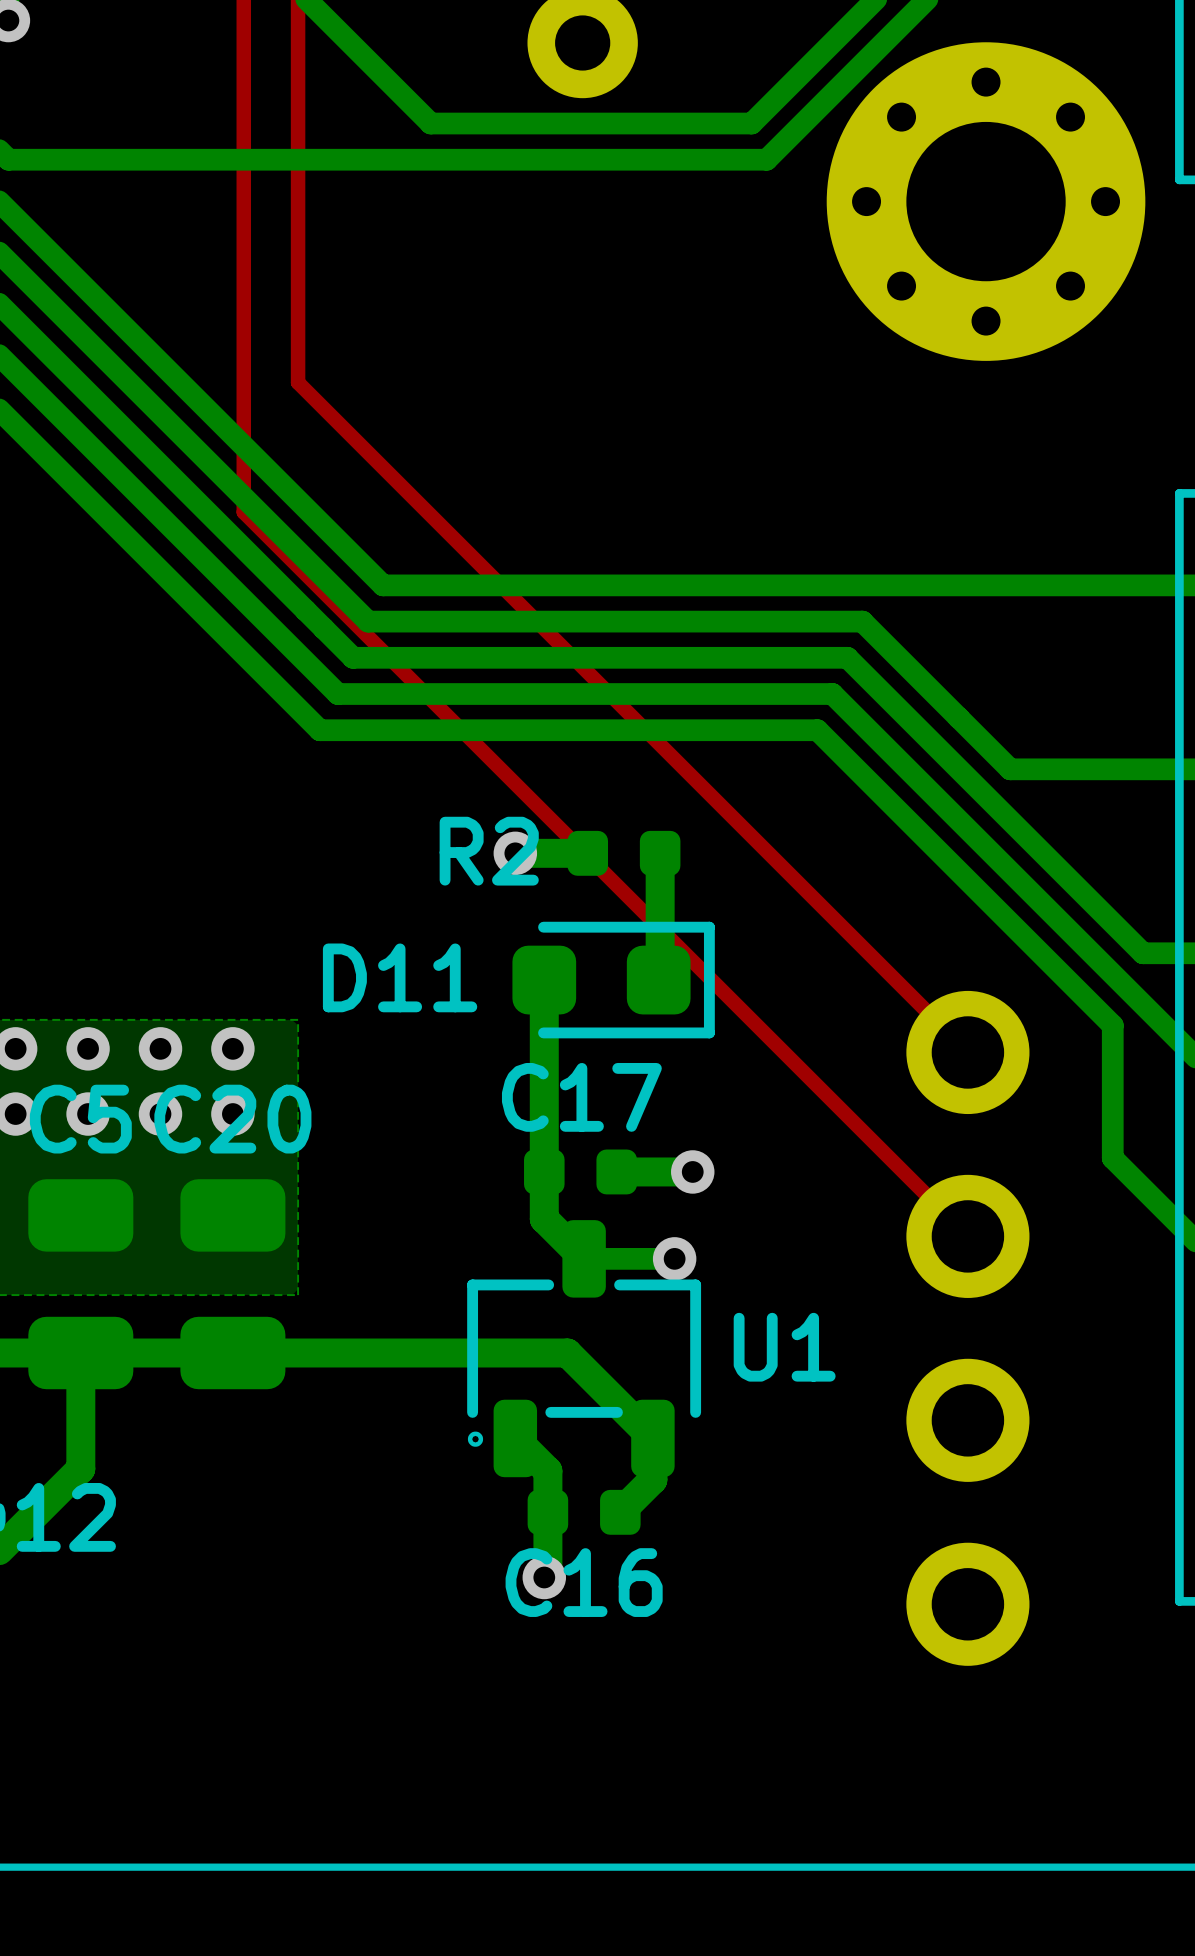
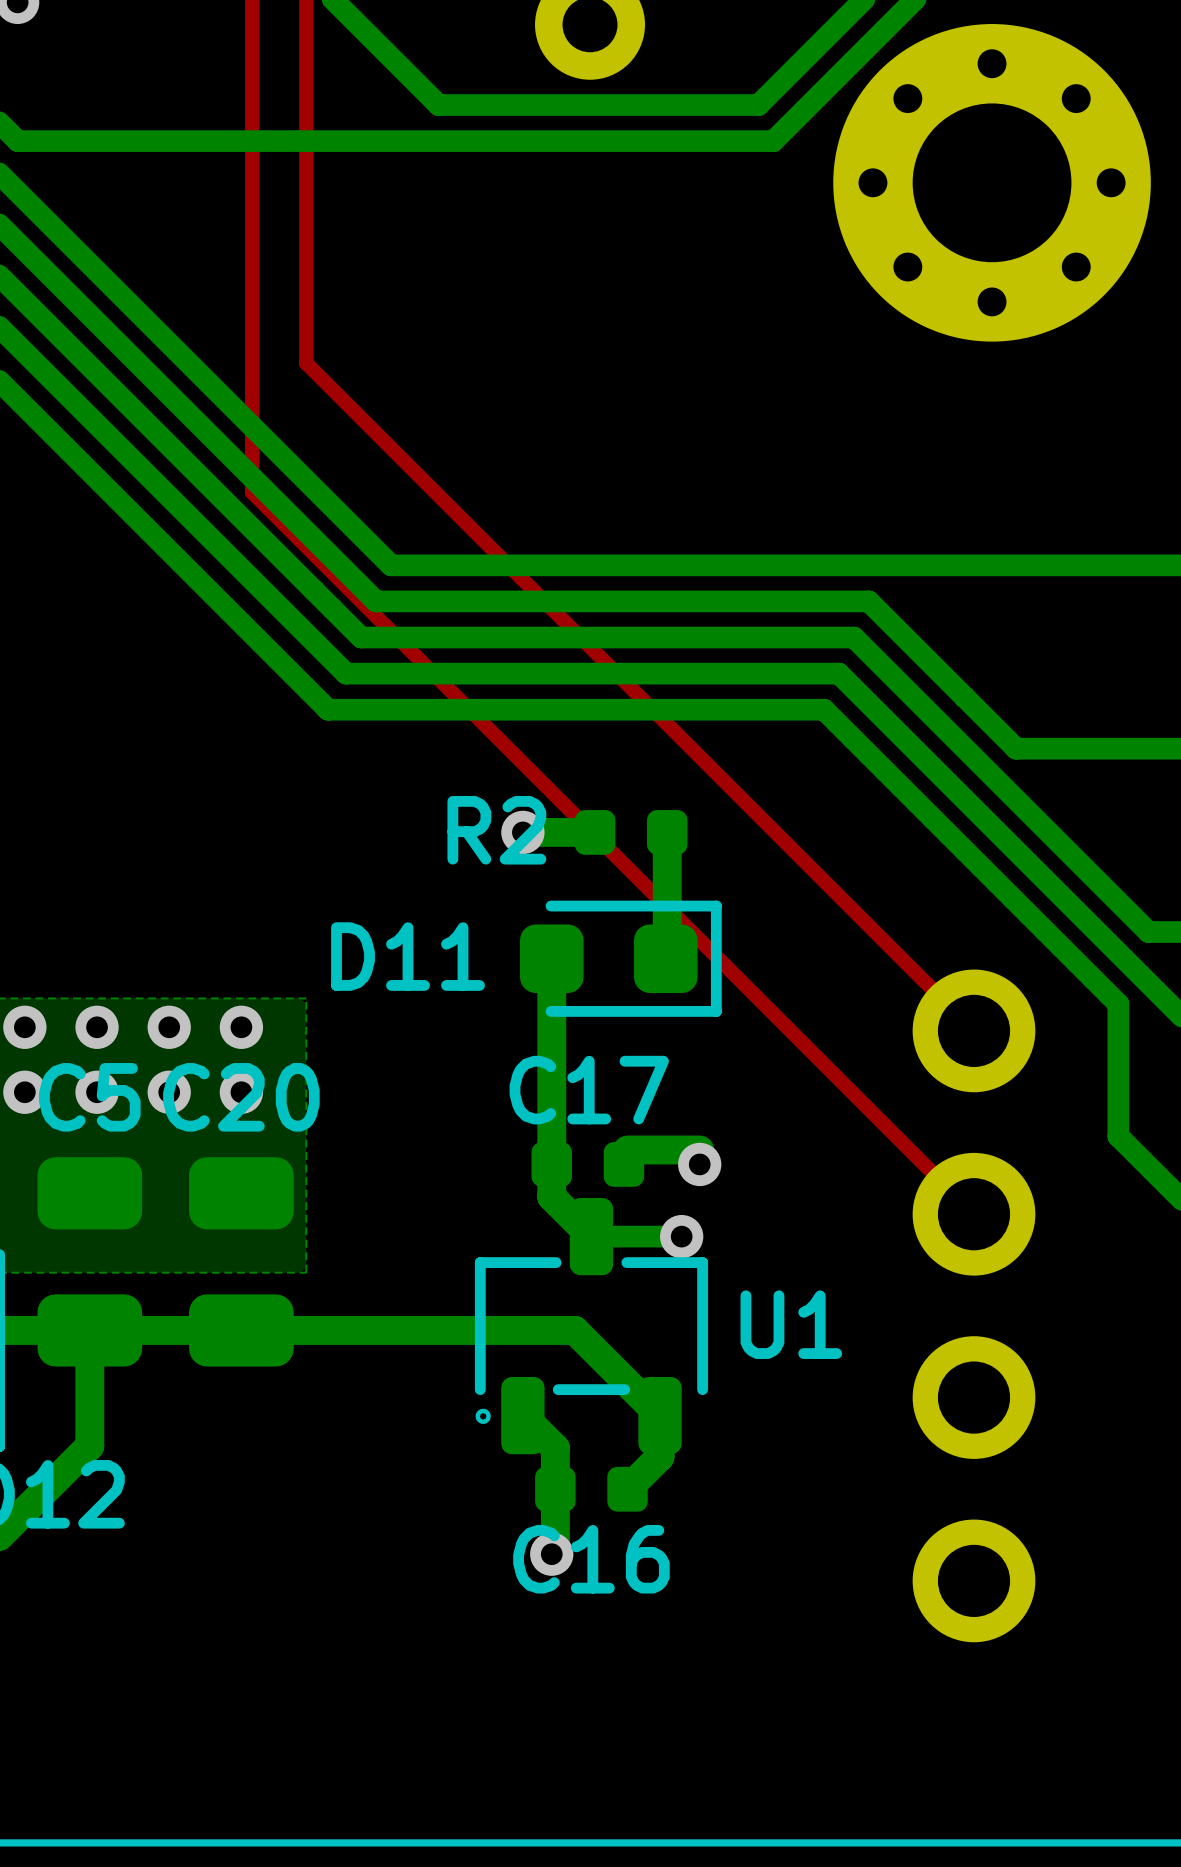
C17 position: (580, 1171) -> (587, 1164)
via position: (692, 1171) -> (699, 1164)

